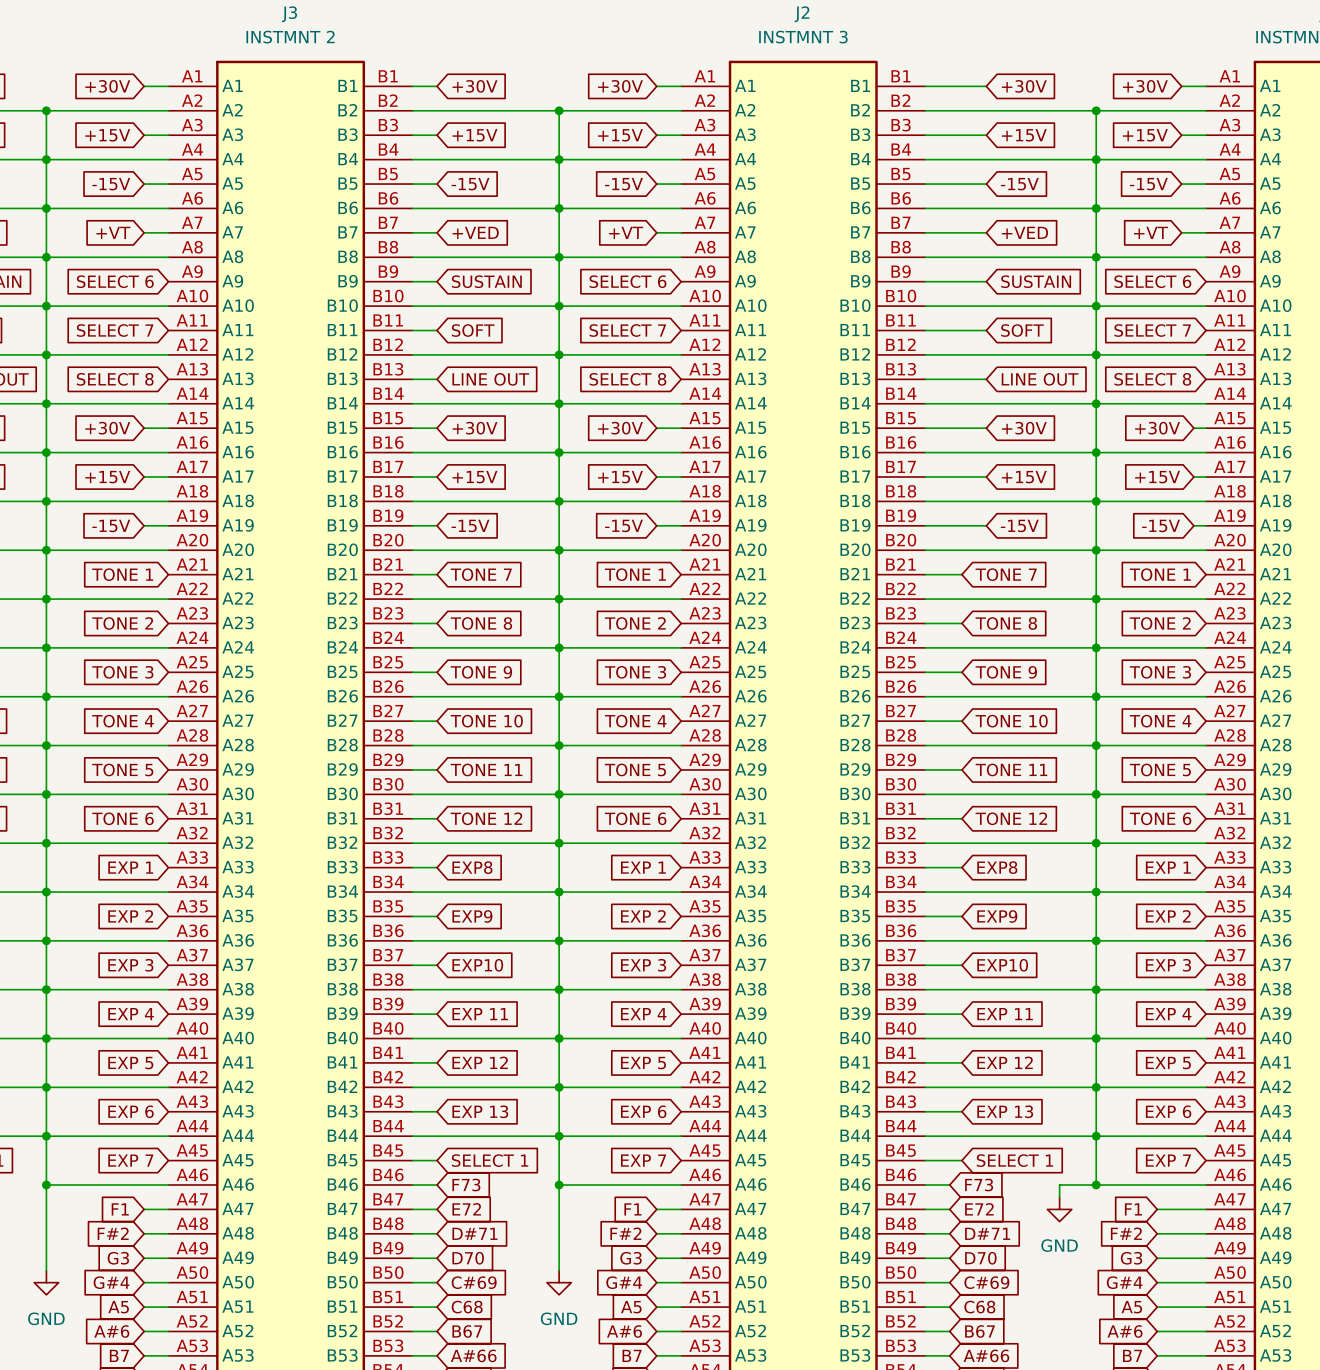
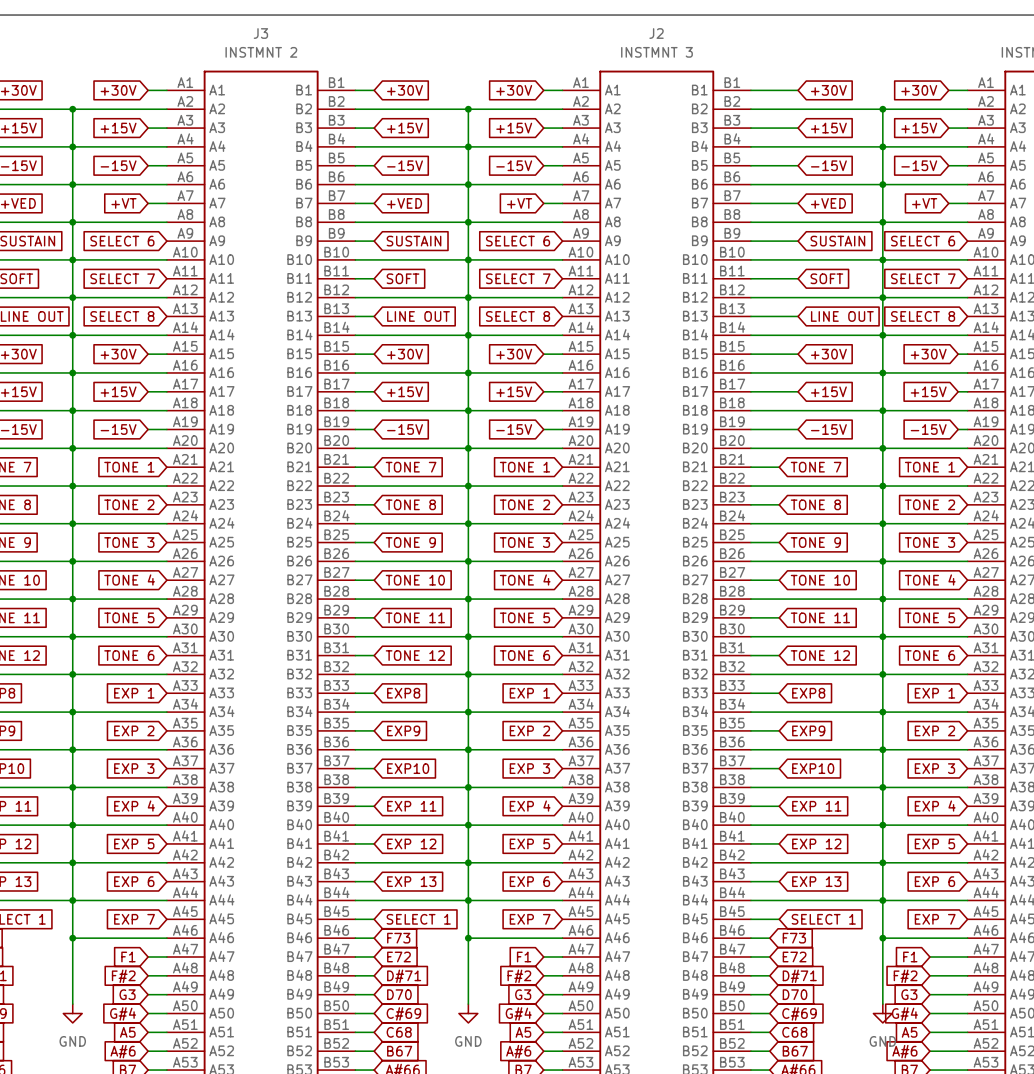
wire: (1096, 1185) (1059, 1185) (1059, 1197) -> (882, 938) (882, 1004)
power symbol position: GND (1059, 1209) -> GND (882, 1013)

